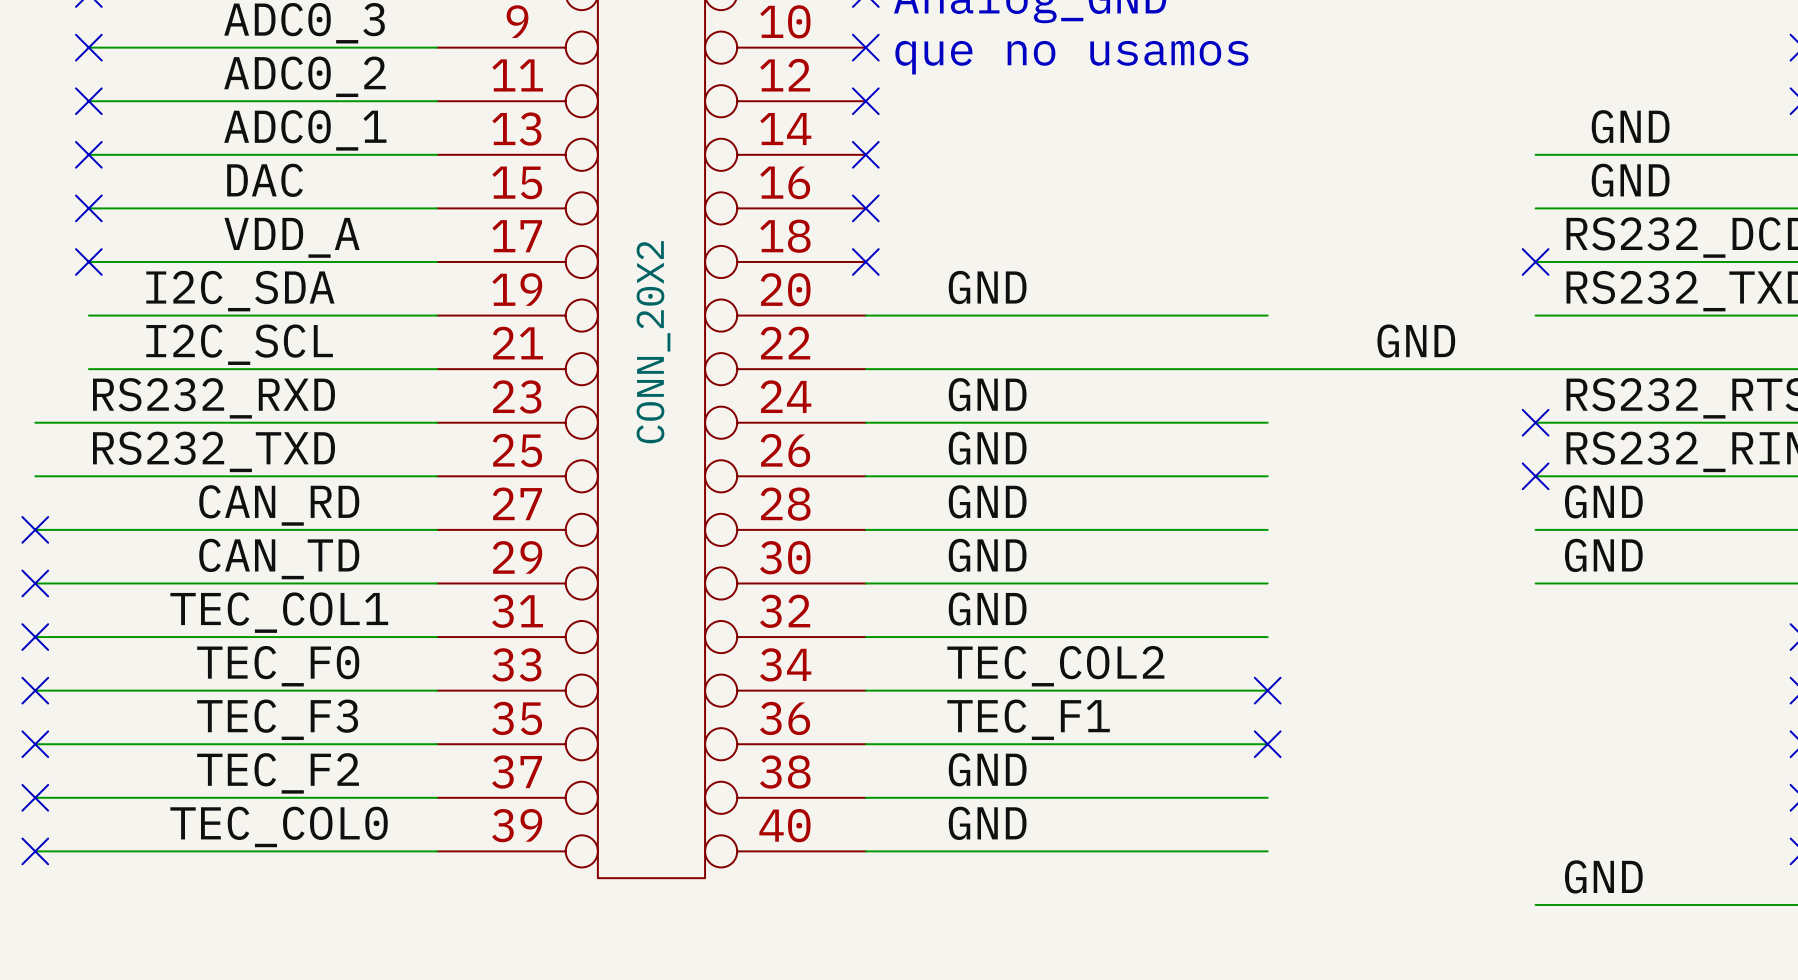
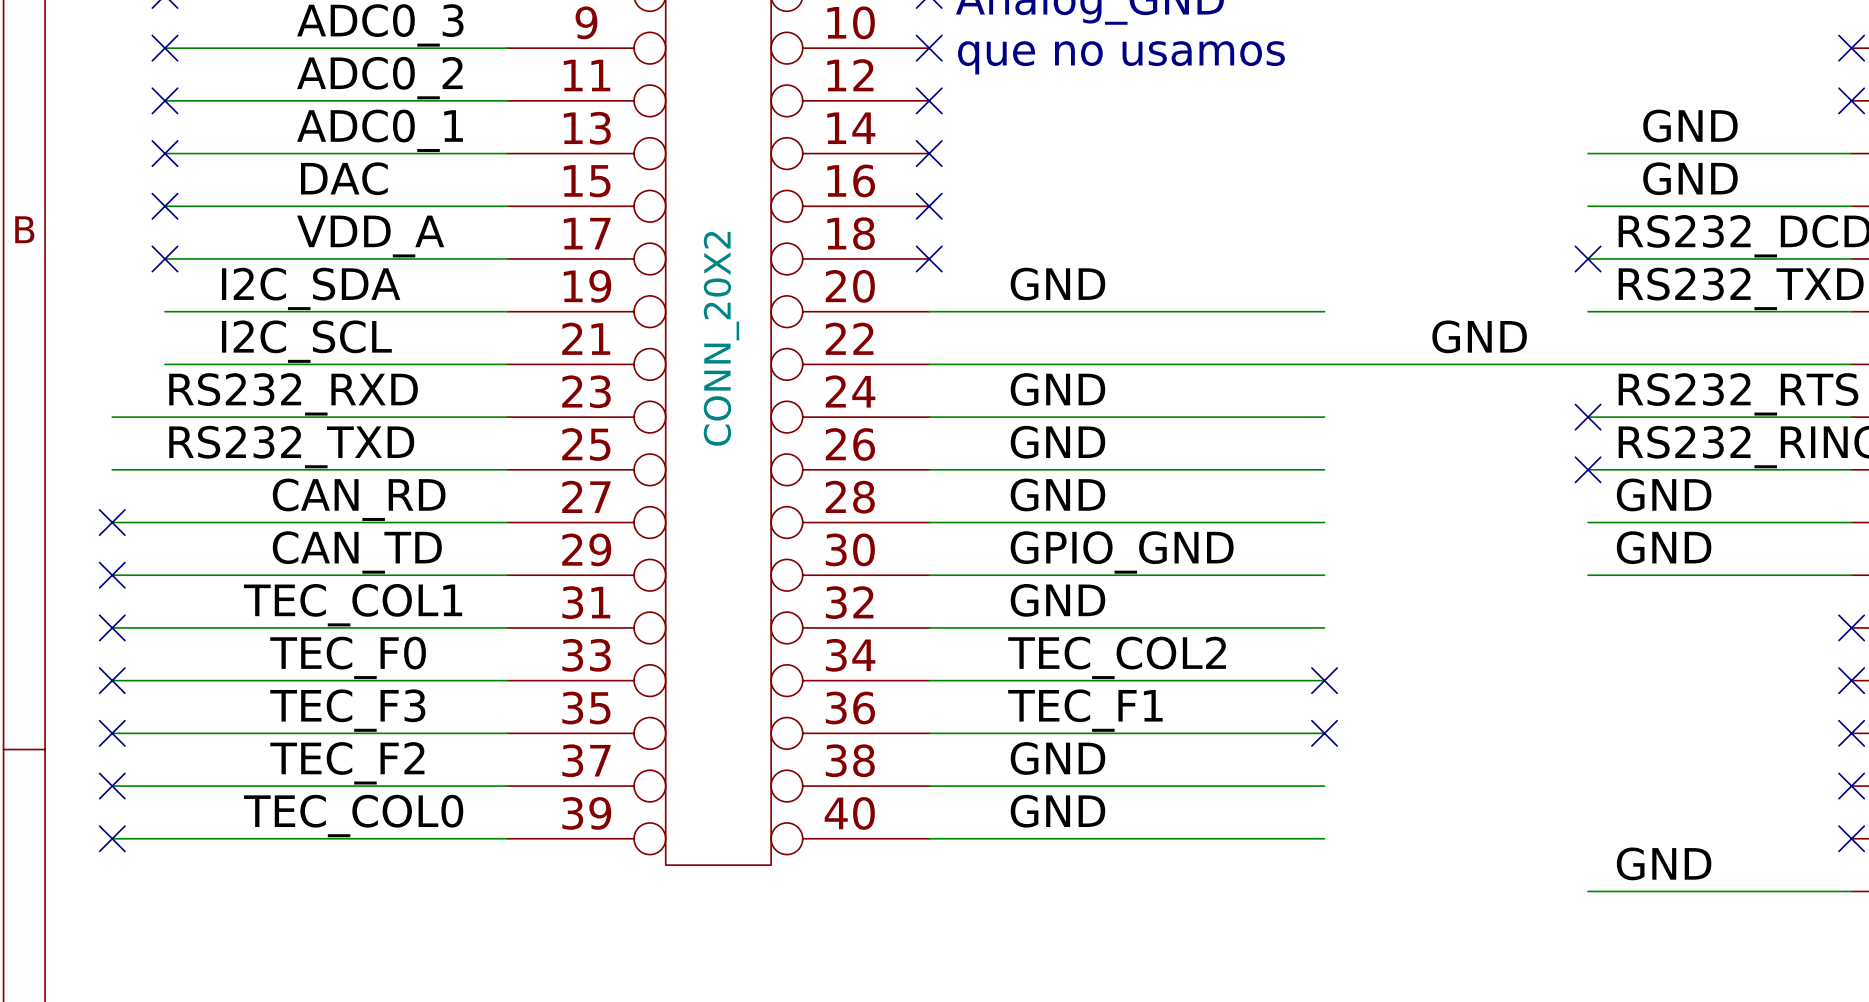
label: GND (987, 555) -> GPIO_GND (1122, 552)

